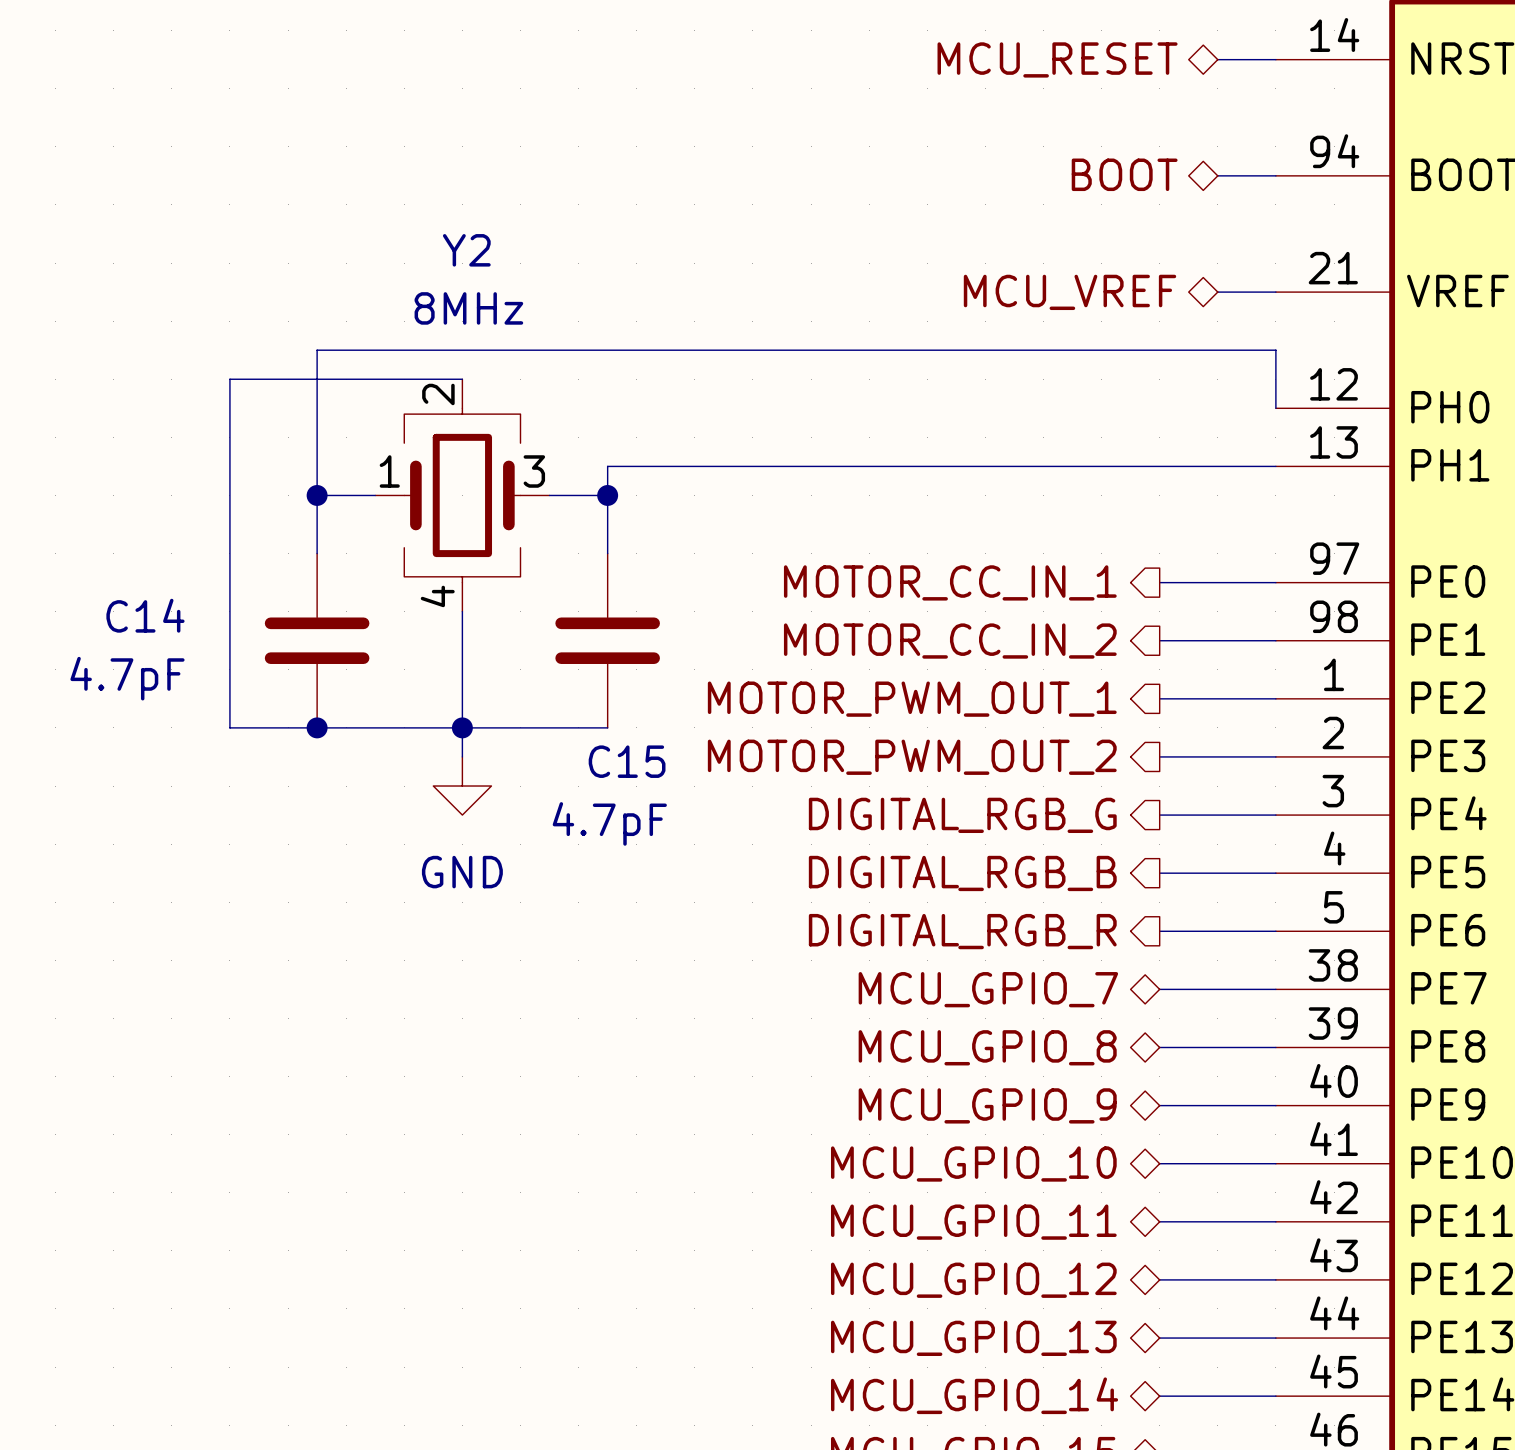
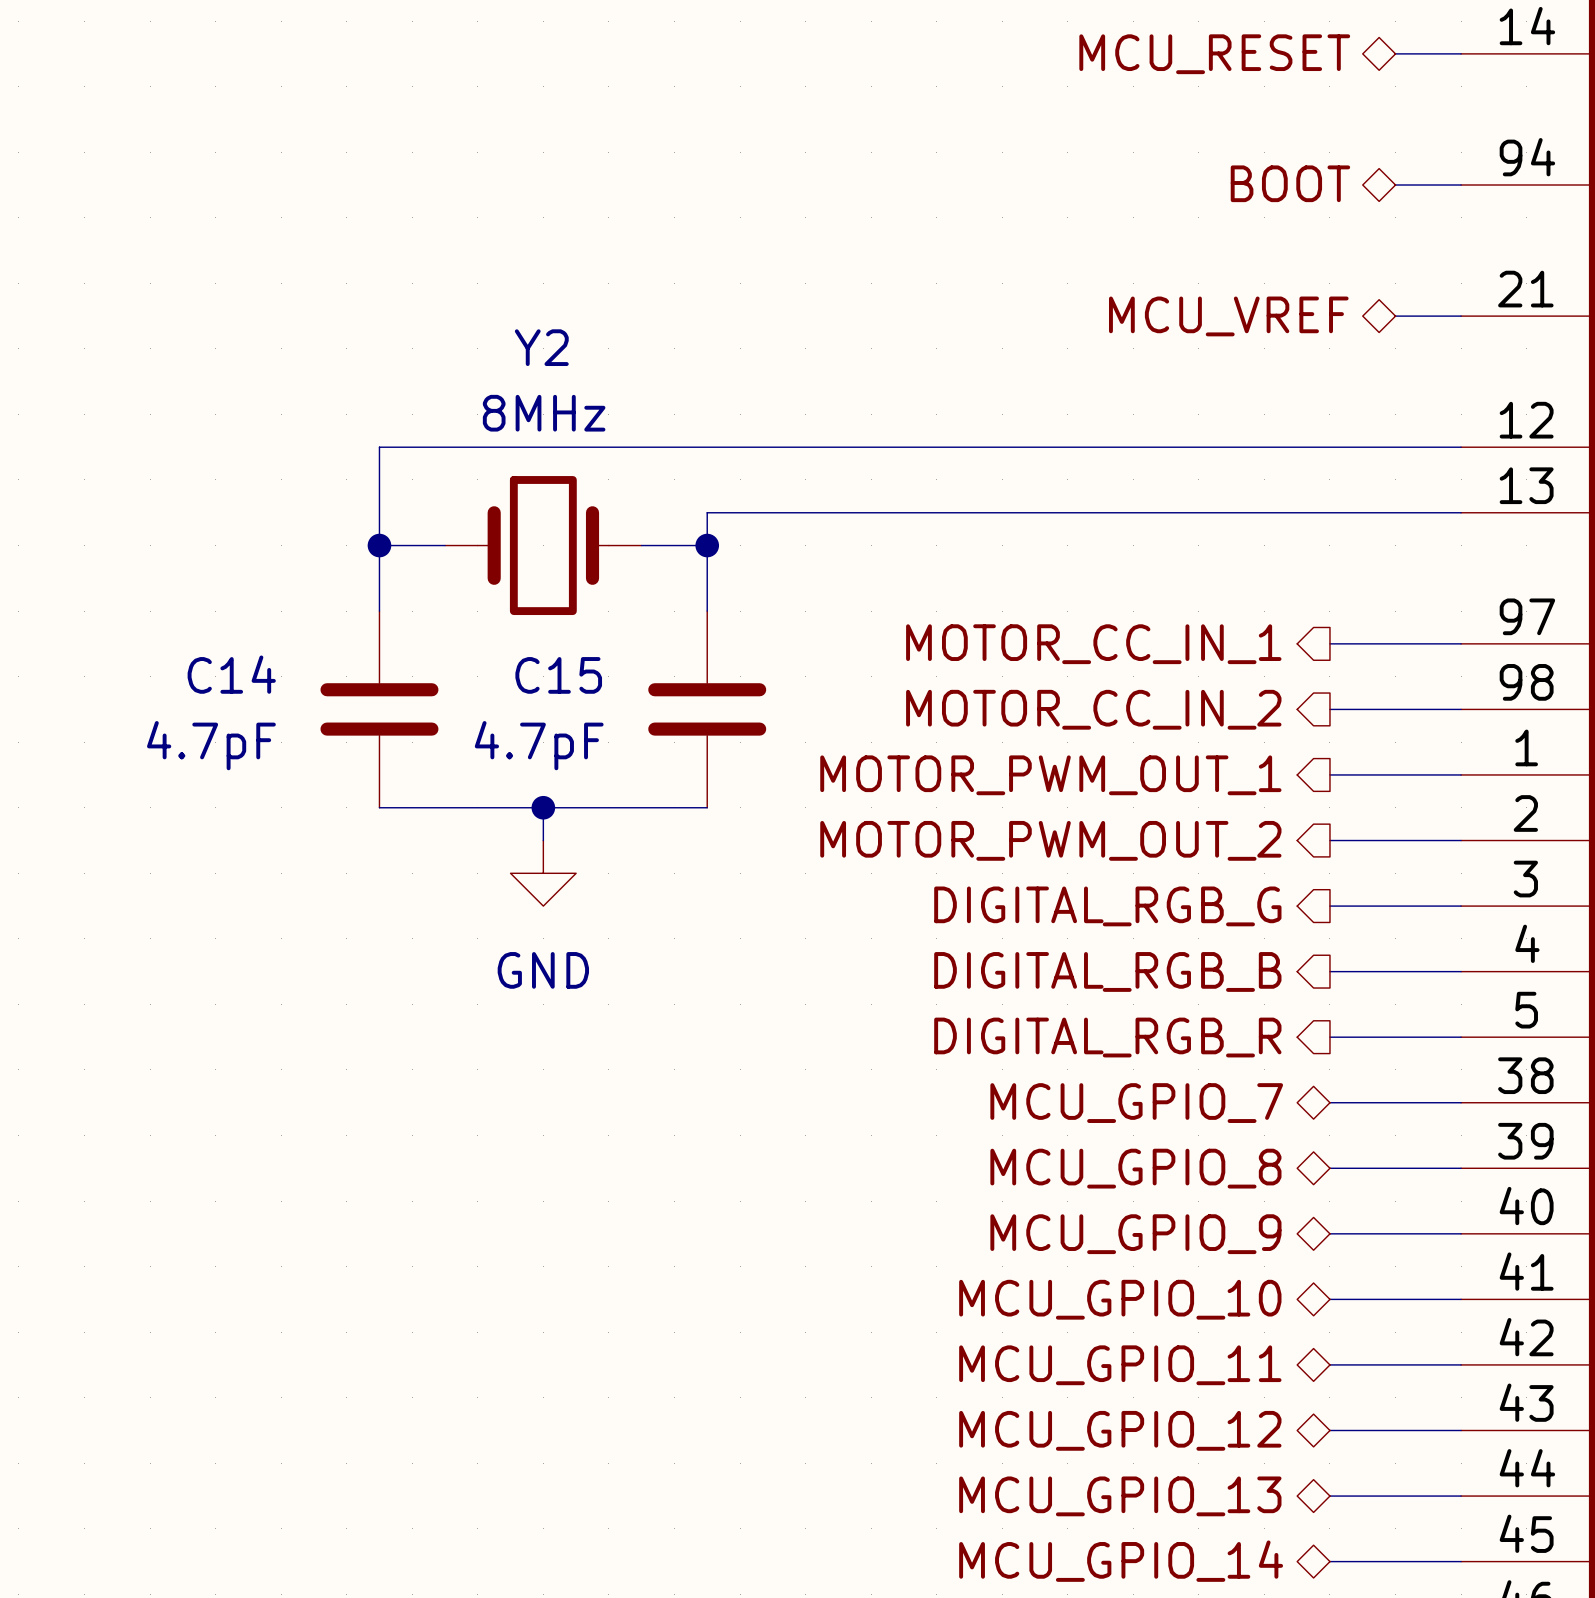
Y2 name position: Y2 (466, 250) -> Y2 (541, 347)
Y2 value position: 8MHz (468, 308) -> 8MHz (544, 413)
Y2 symbol: [375, 379, 550, 612] -> [445, 476, 642, 616]
wire: (462, 379) (229, 379) (229, 727) (317, 727) -> none
wire: (317, 408) (317, 350) (1275, 350) (1275, 408) -> (379, 447) (1461, 447)
wire: (462, 611) (462, 727) -> none
C14 name position: C14 (145, 615) -> C14 (231, 674)
C14 value position: 4.7pF (127, 678) -> 4.7pF (211, 745)
junction: (317, 727) -> none
C15 name position: C15 (627, 761) -> C15 (558, 675)
C15 value position: 4.7pF (609, 823) -> 4.7pF (539, 745)

